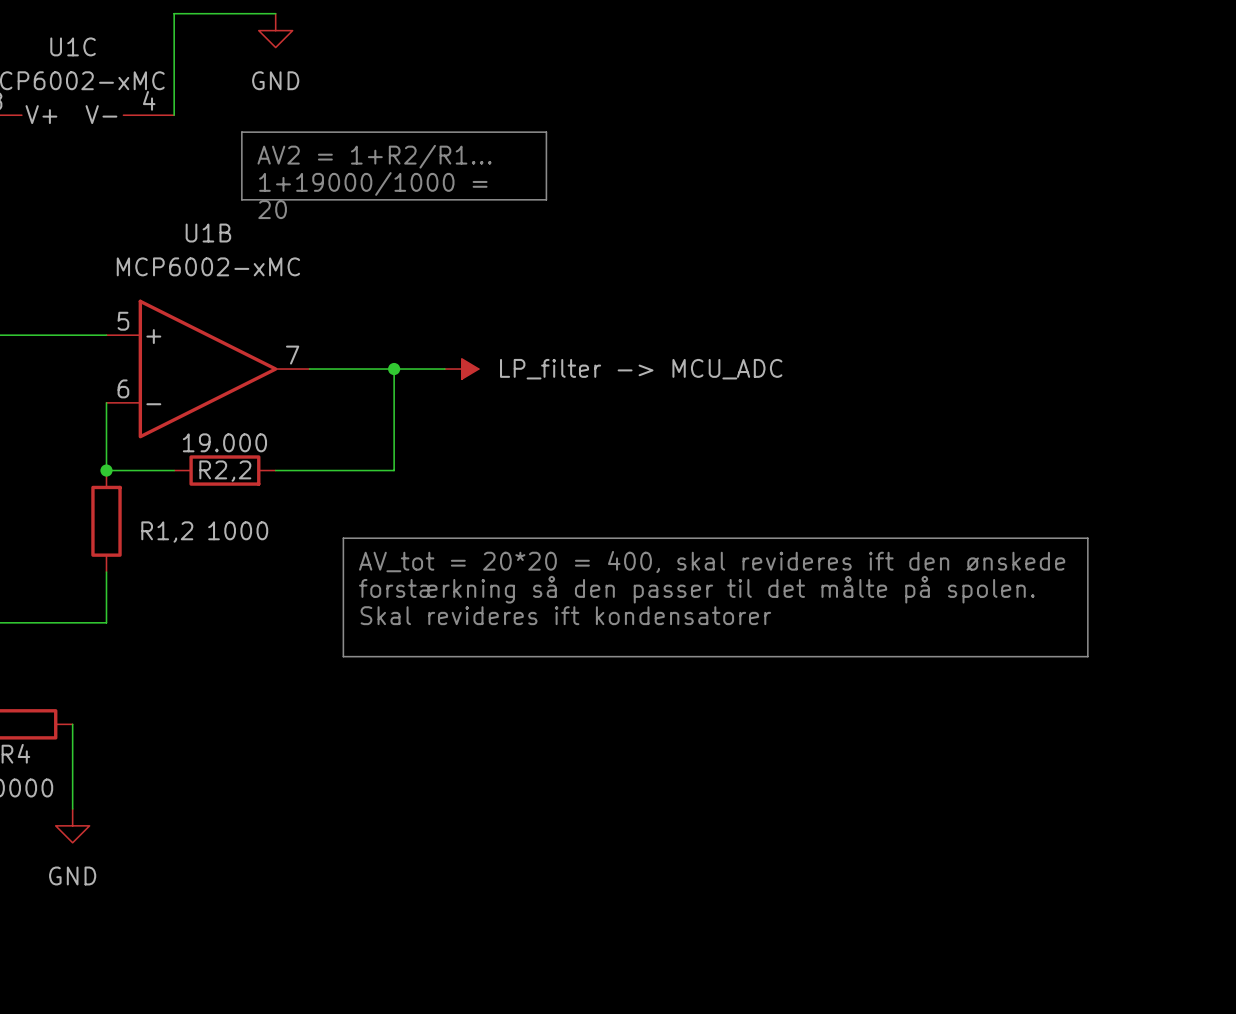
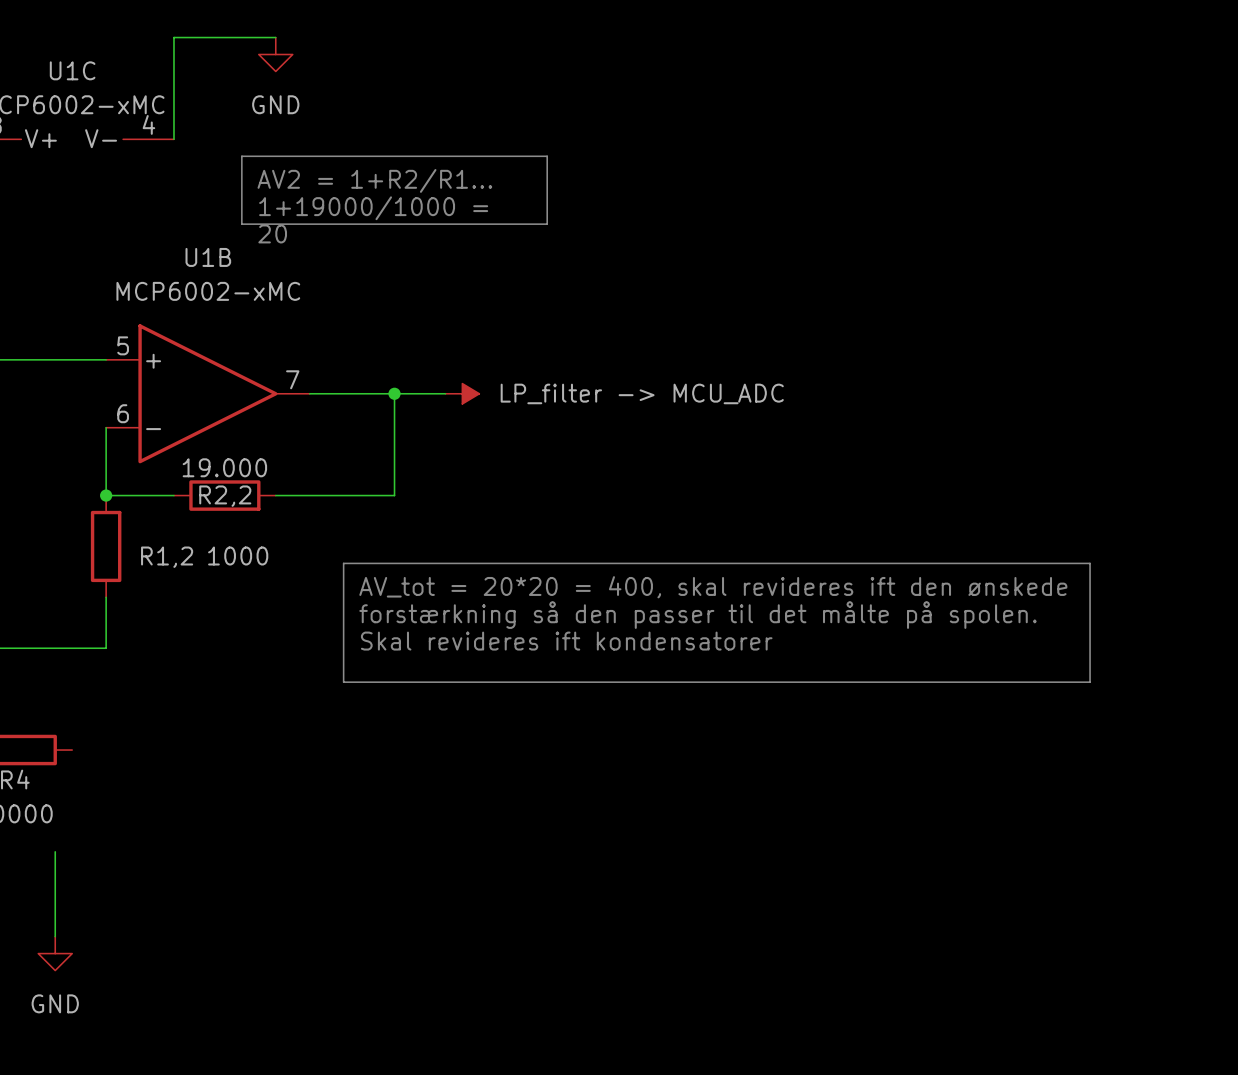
wire: (72, 724) (72, 808) -> (55, 851) (55, 936)
power symbol position: GND (72, 825) -> GND (55, 953)

